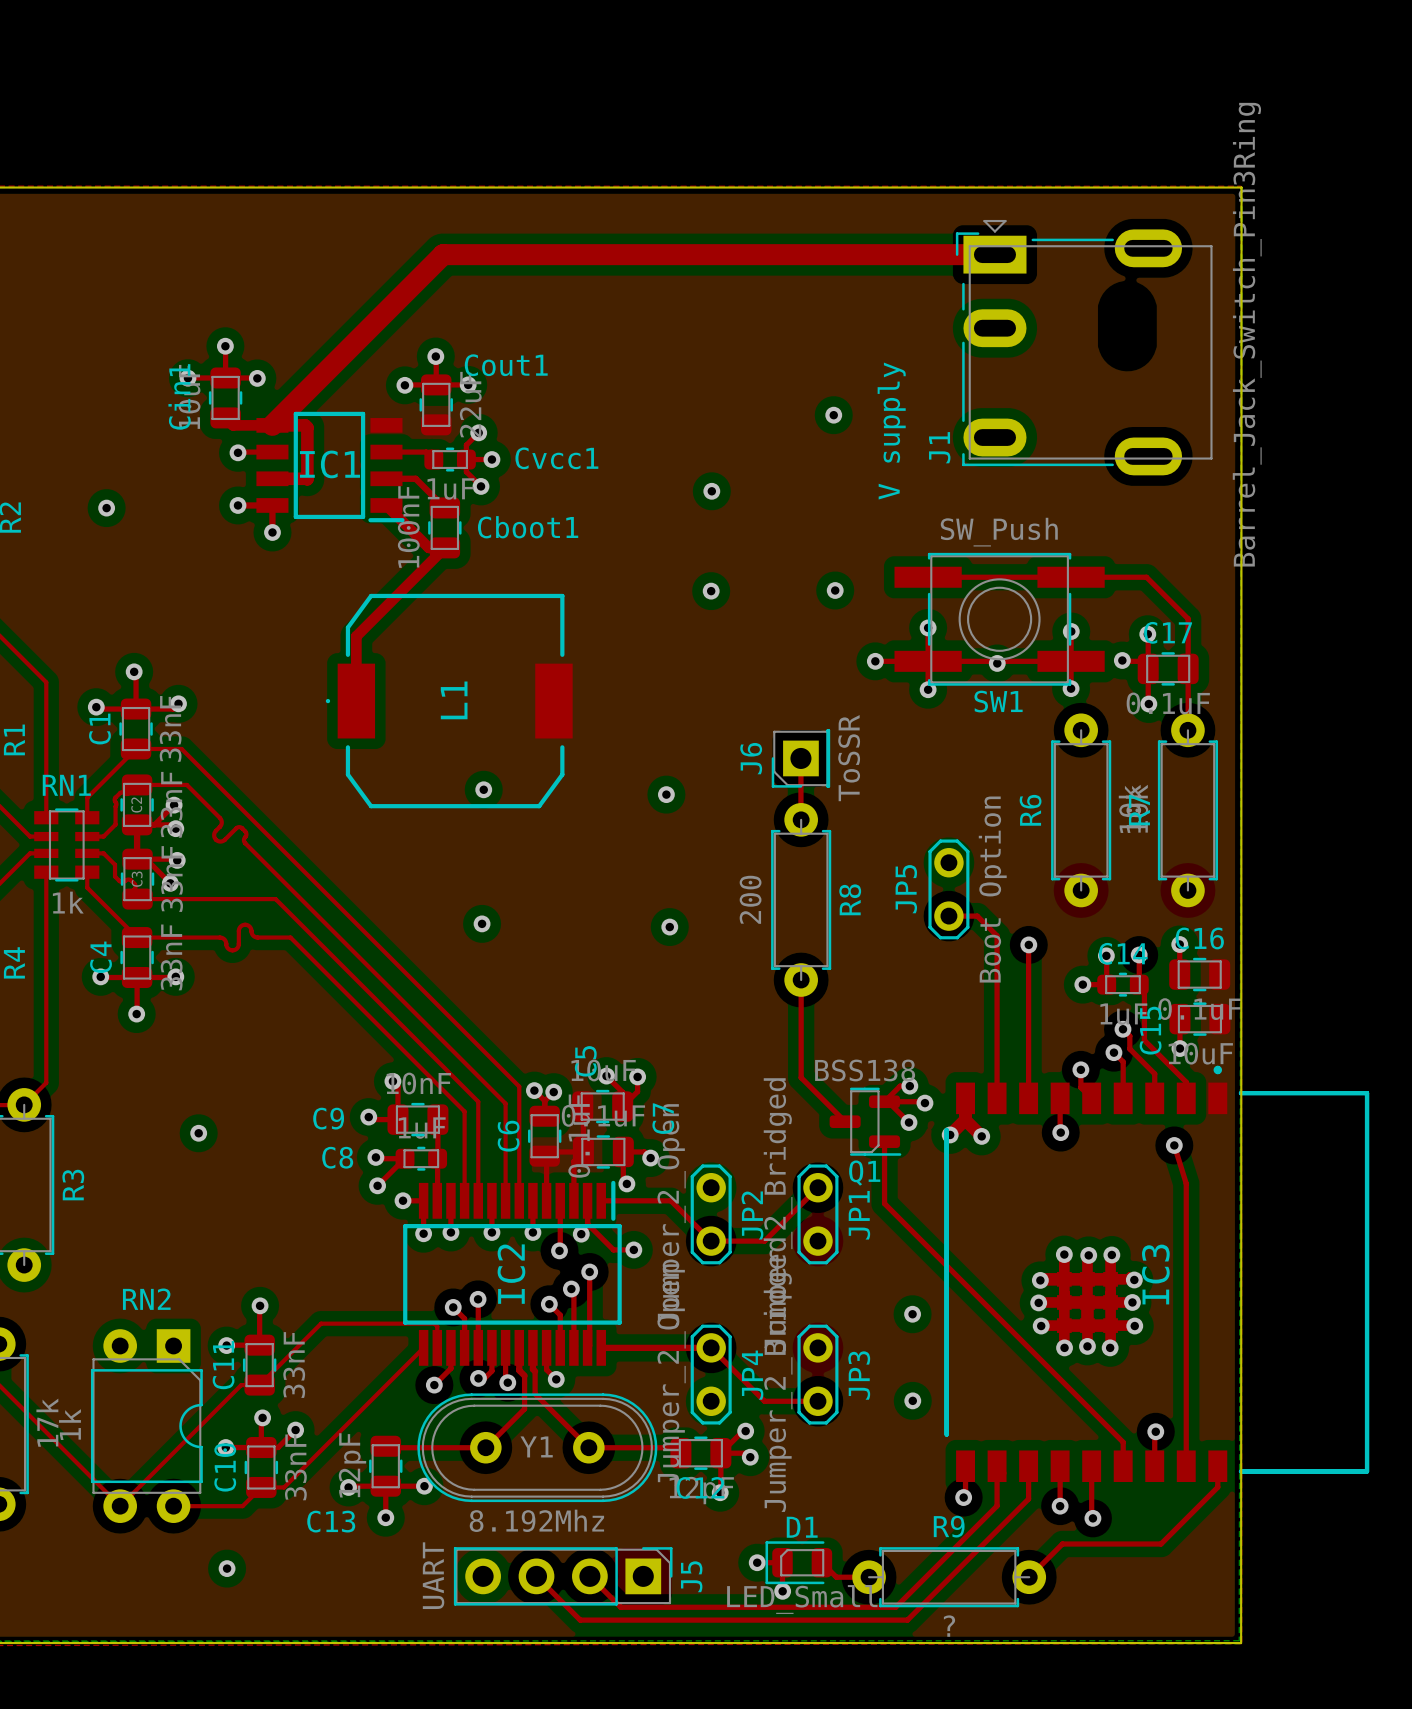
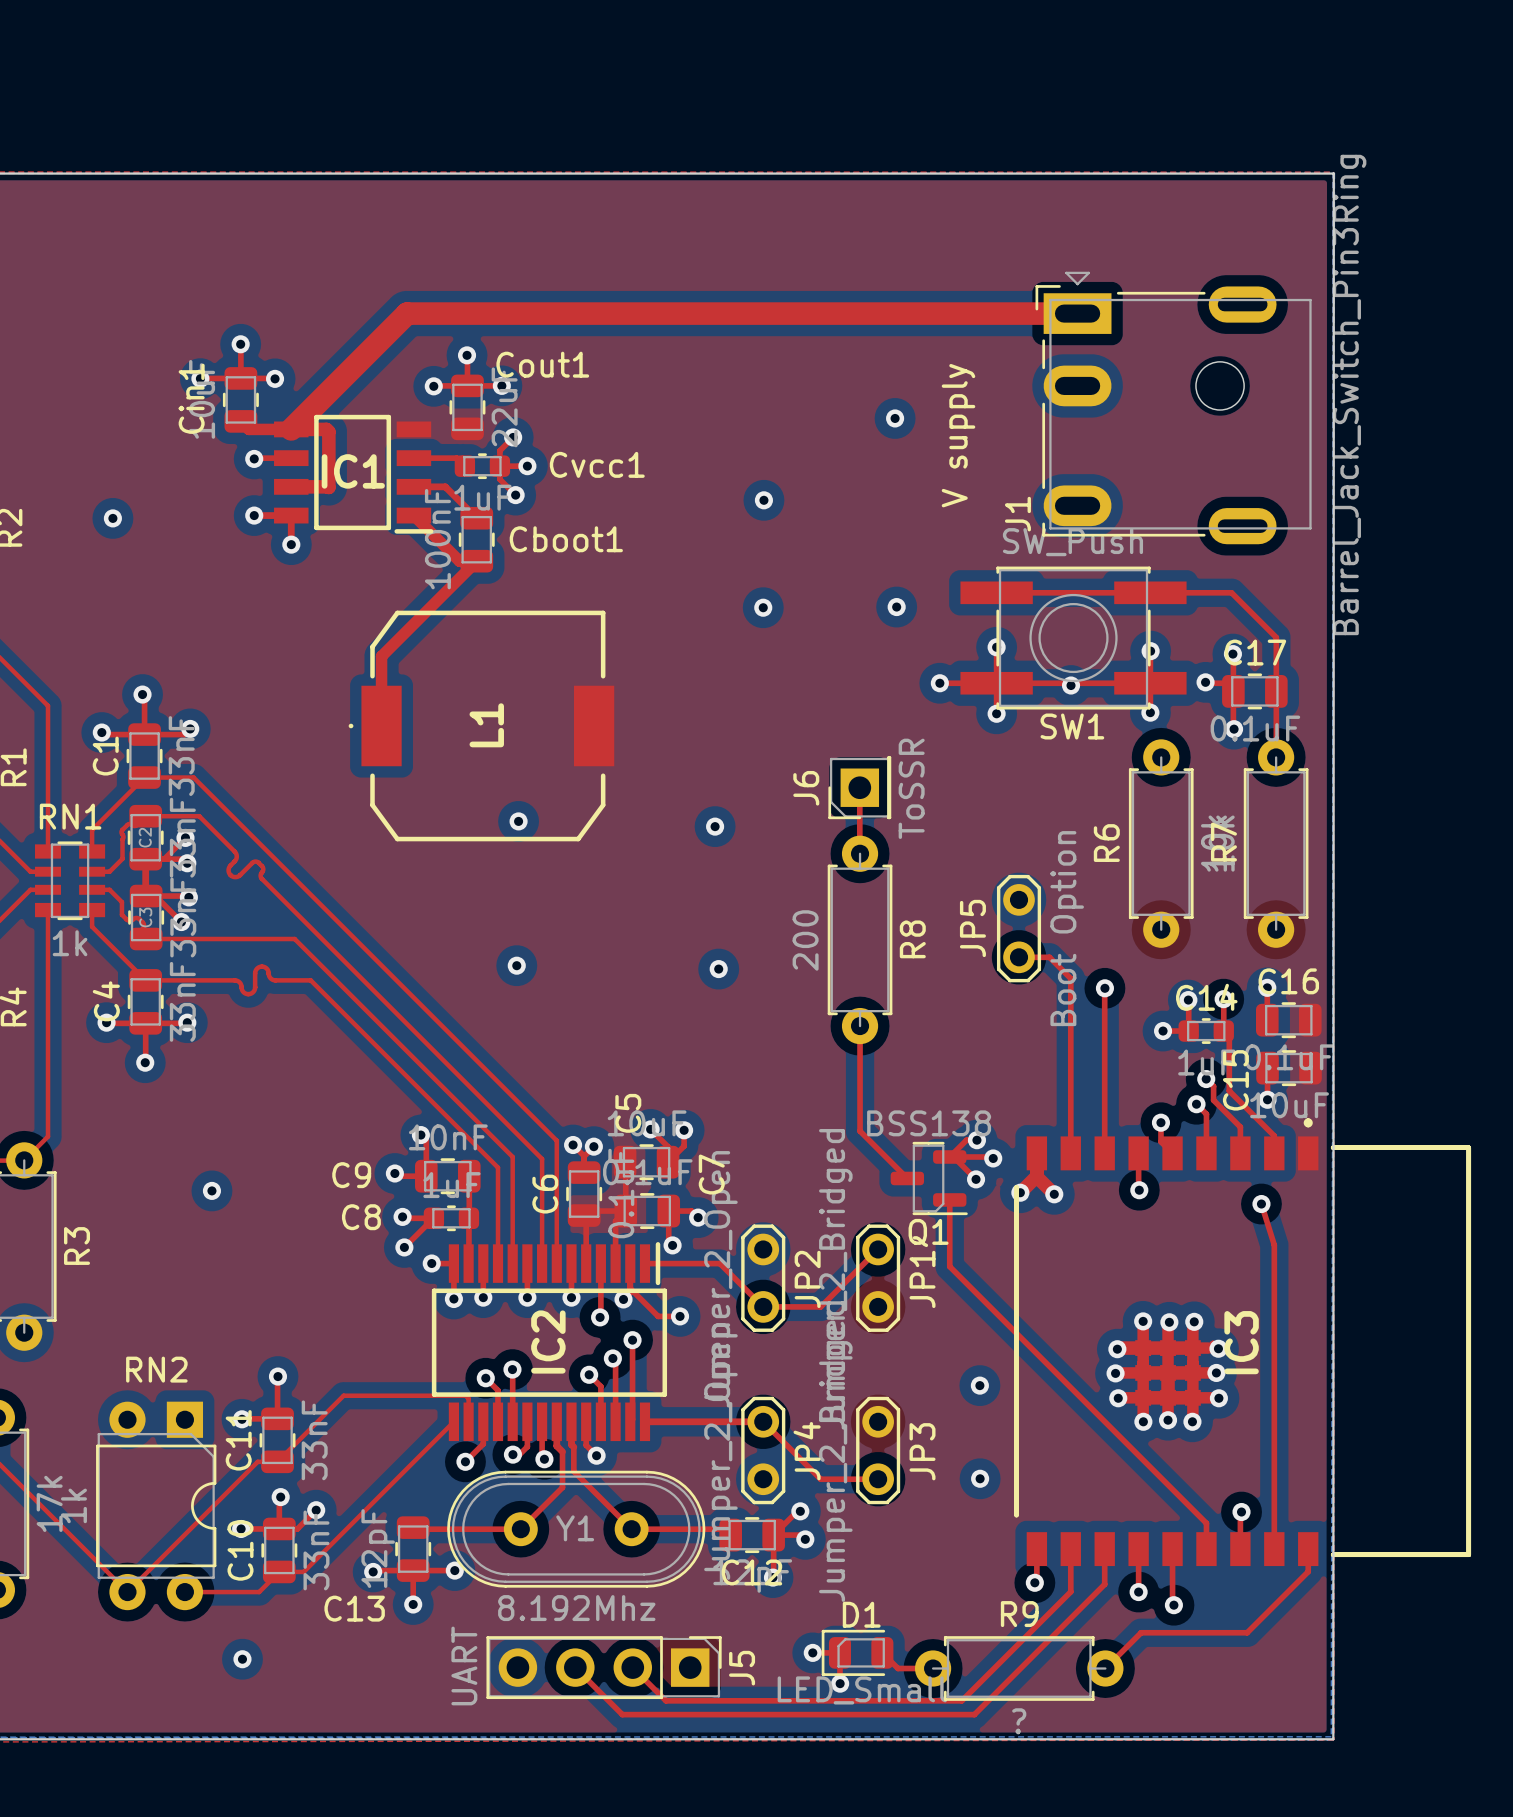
J1 footprint: [955, 219, 1213, 476] -> [1035, 271, 1312, 545]
top track: (994, 254) (443, 254) (380, 317) -> (1077, 313) (407, 313)

